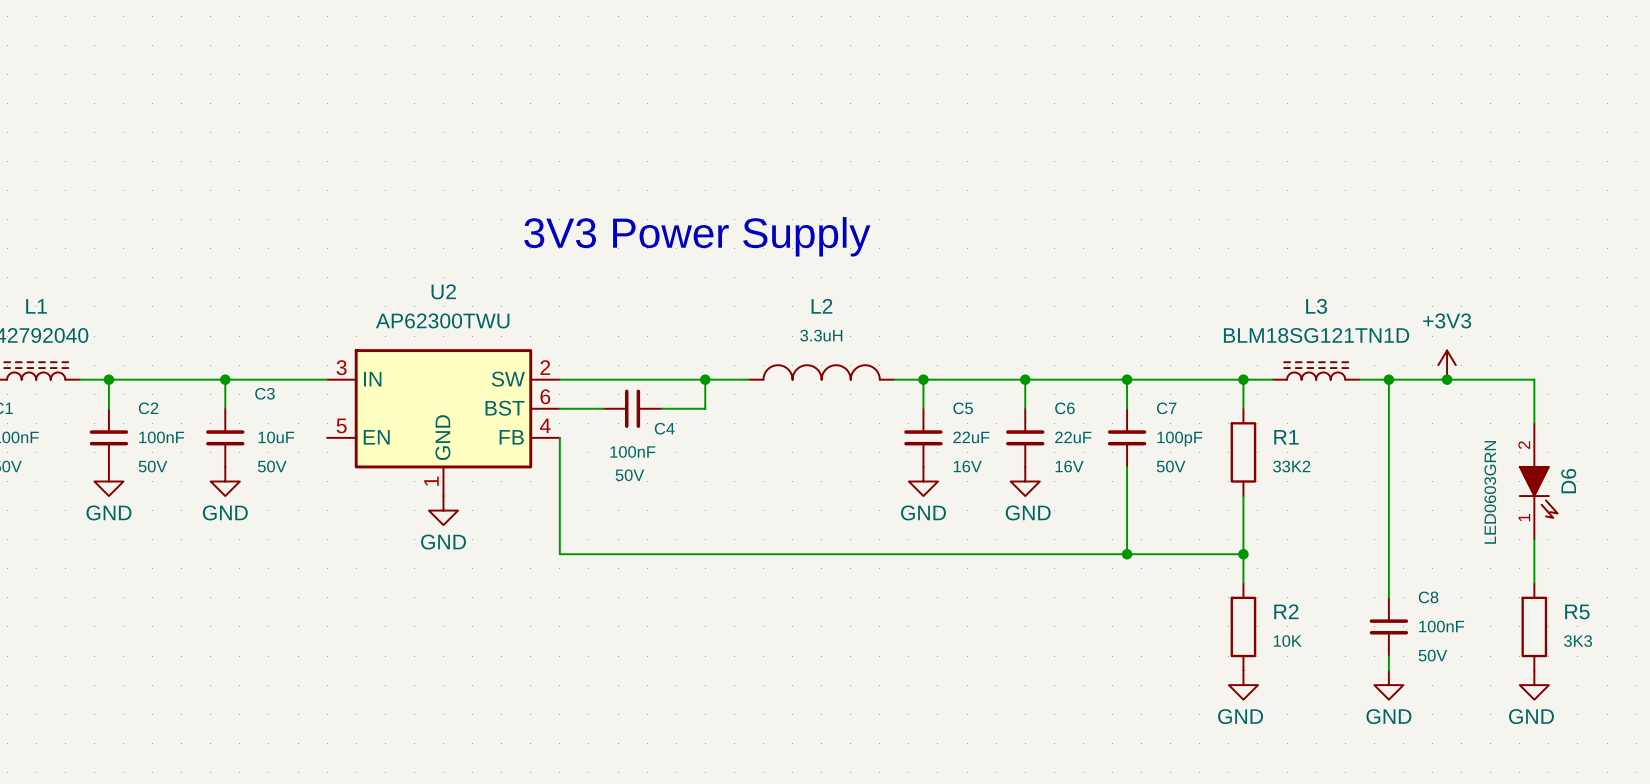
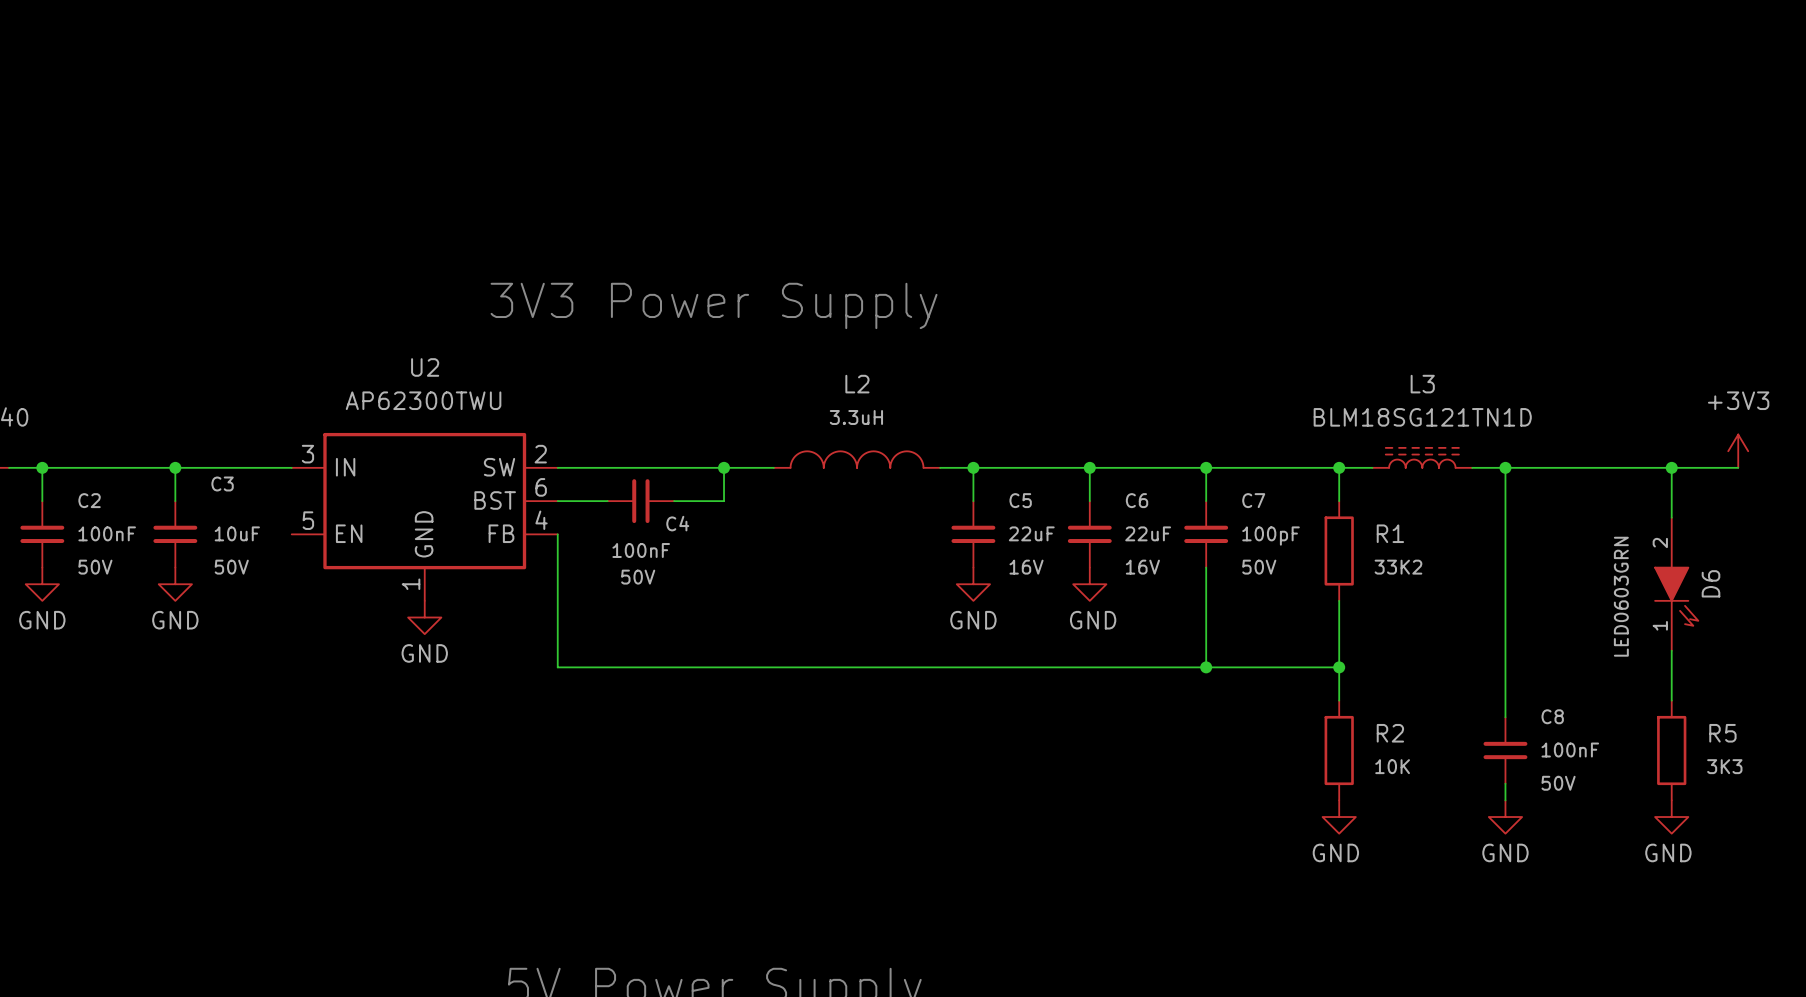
power symbol position: +3V3 (1447, 365) -> +3V3 (1738, 451)
junction: (1447, 379) -> none
wire: none -> (1671, 467) (1738, 467)
junction: none -> (1671, 467)

